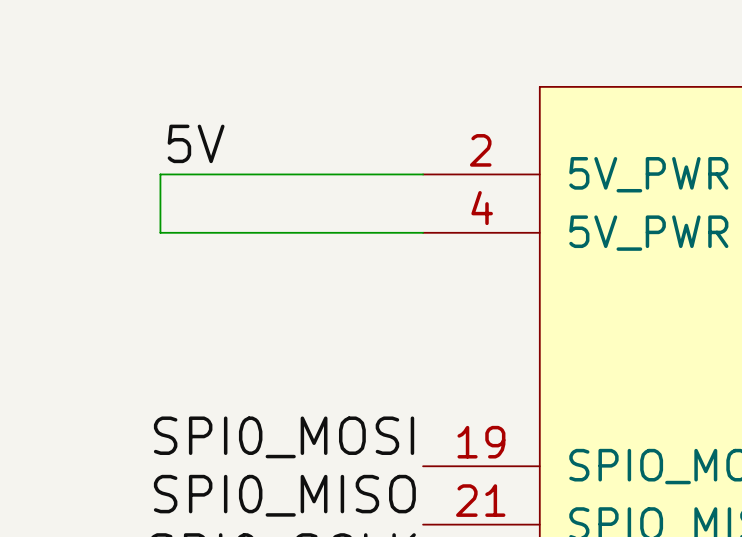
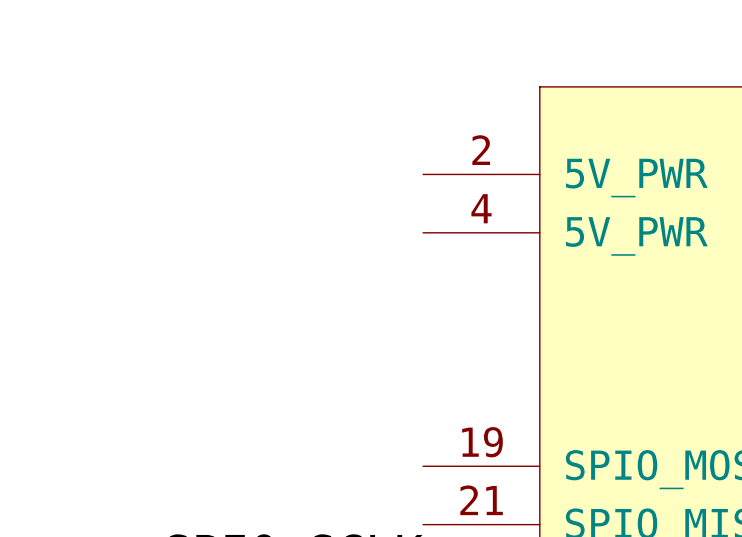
label: 5V (196, 143) -> none
wire: (423, 174) (160, 174) (160, 232) (423, 232) -> none
label: SPI0_MOSI (284, 437) -> none
label: SPI0_MISO (284, 495) -> none

